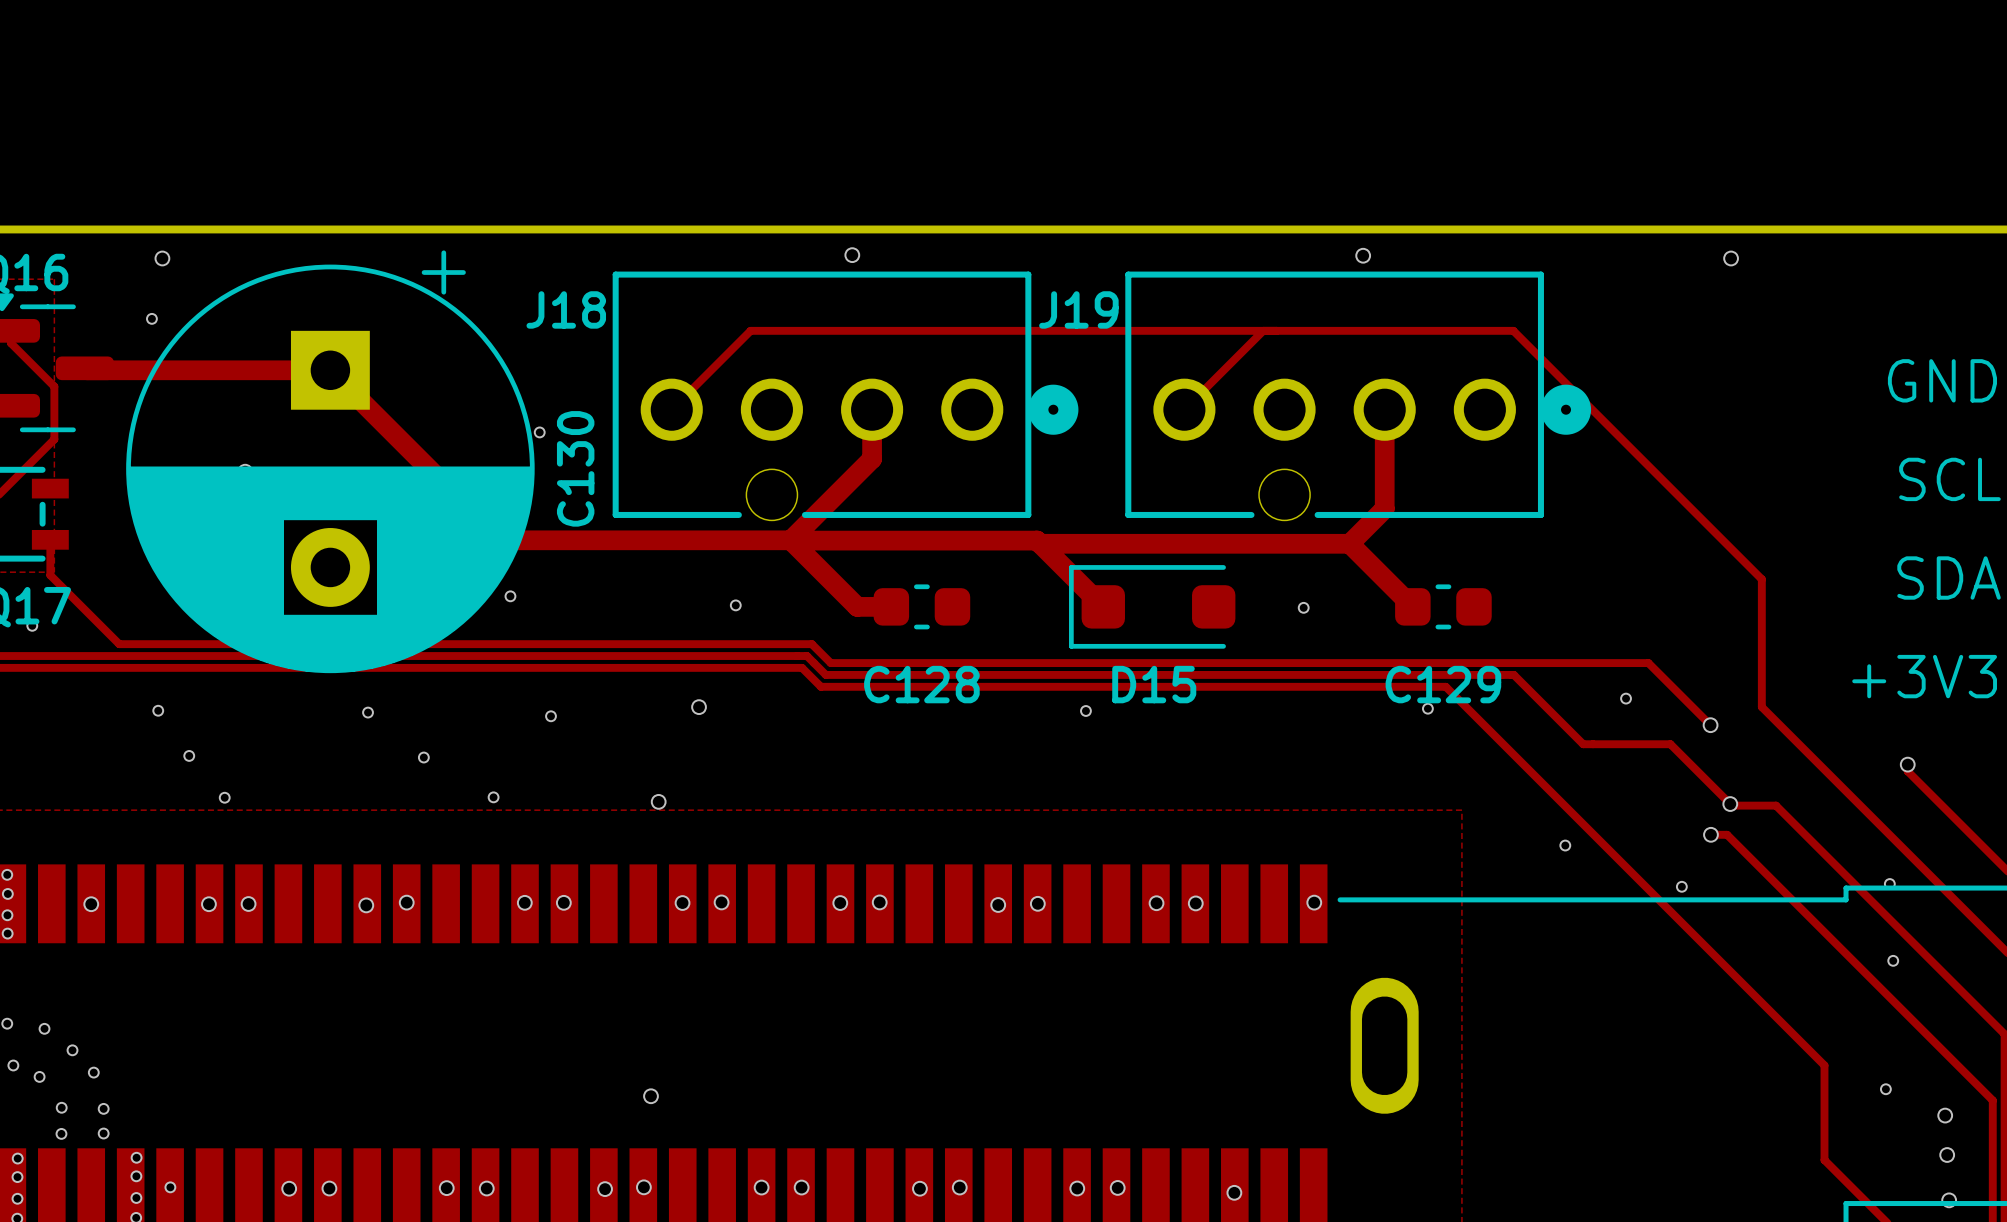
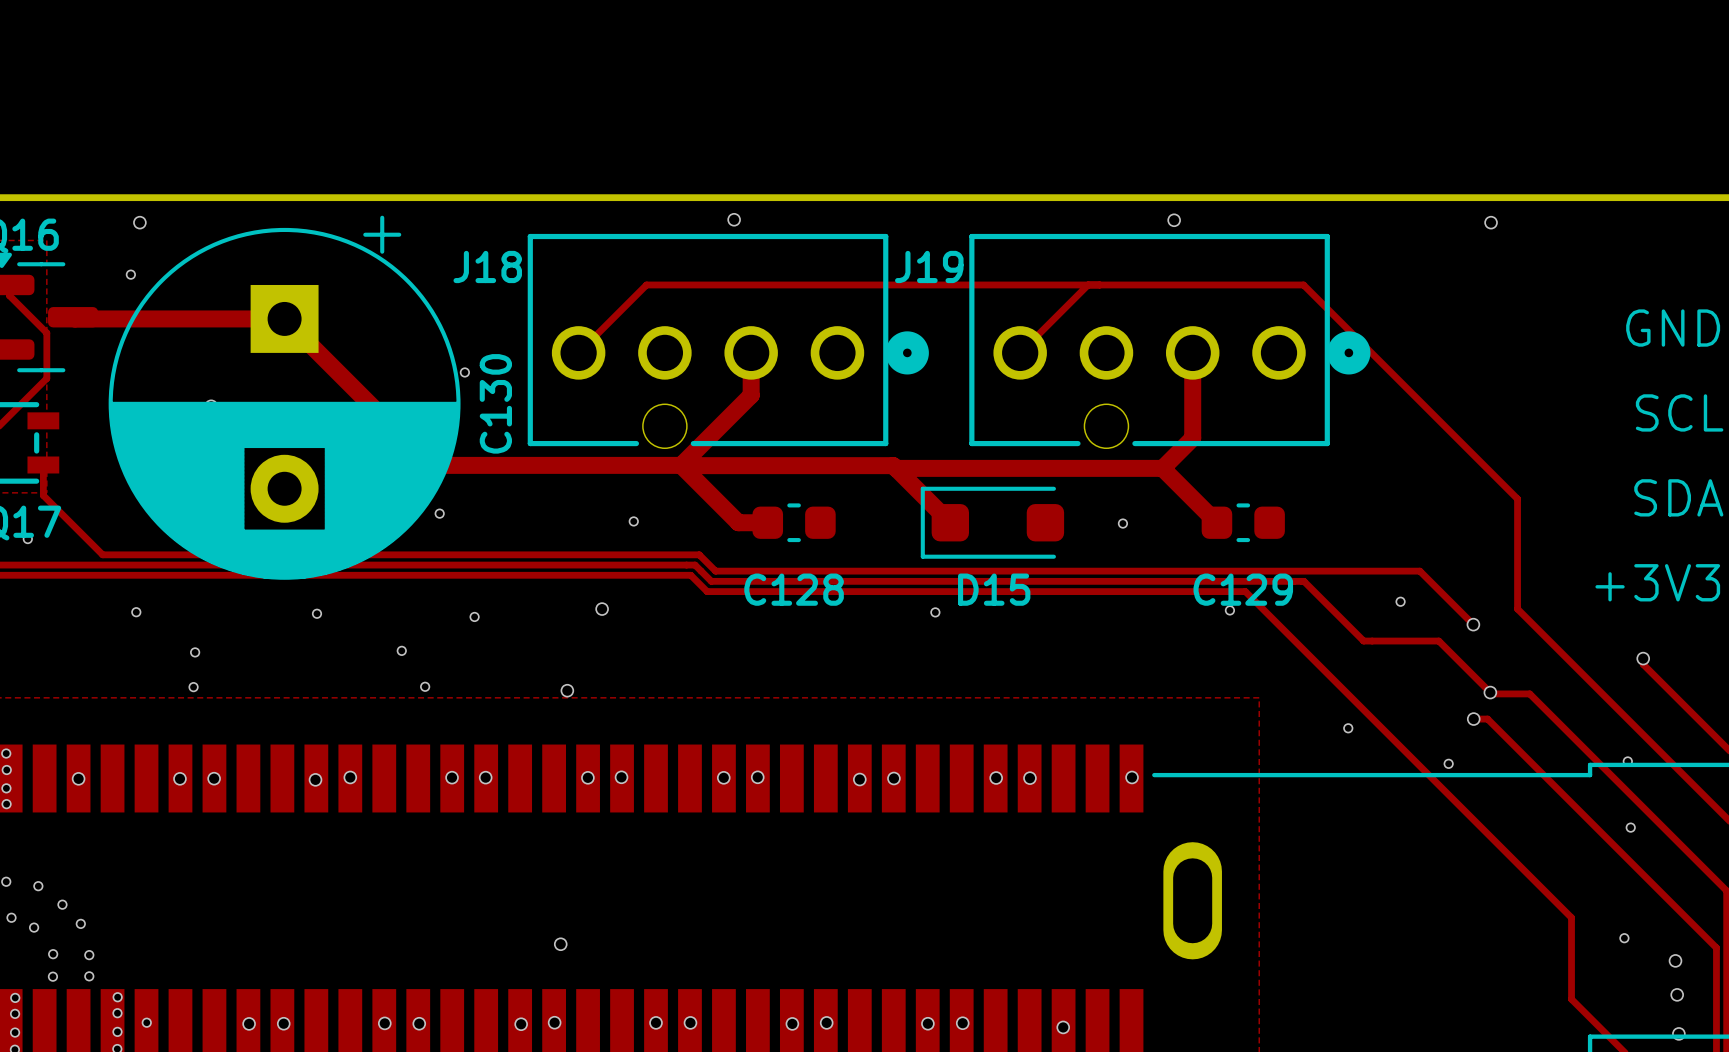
via position: (189, 755) -> (195, 652)
via position: (423, 757) -> (401, 650)

